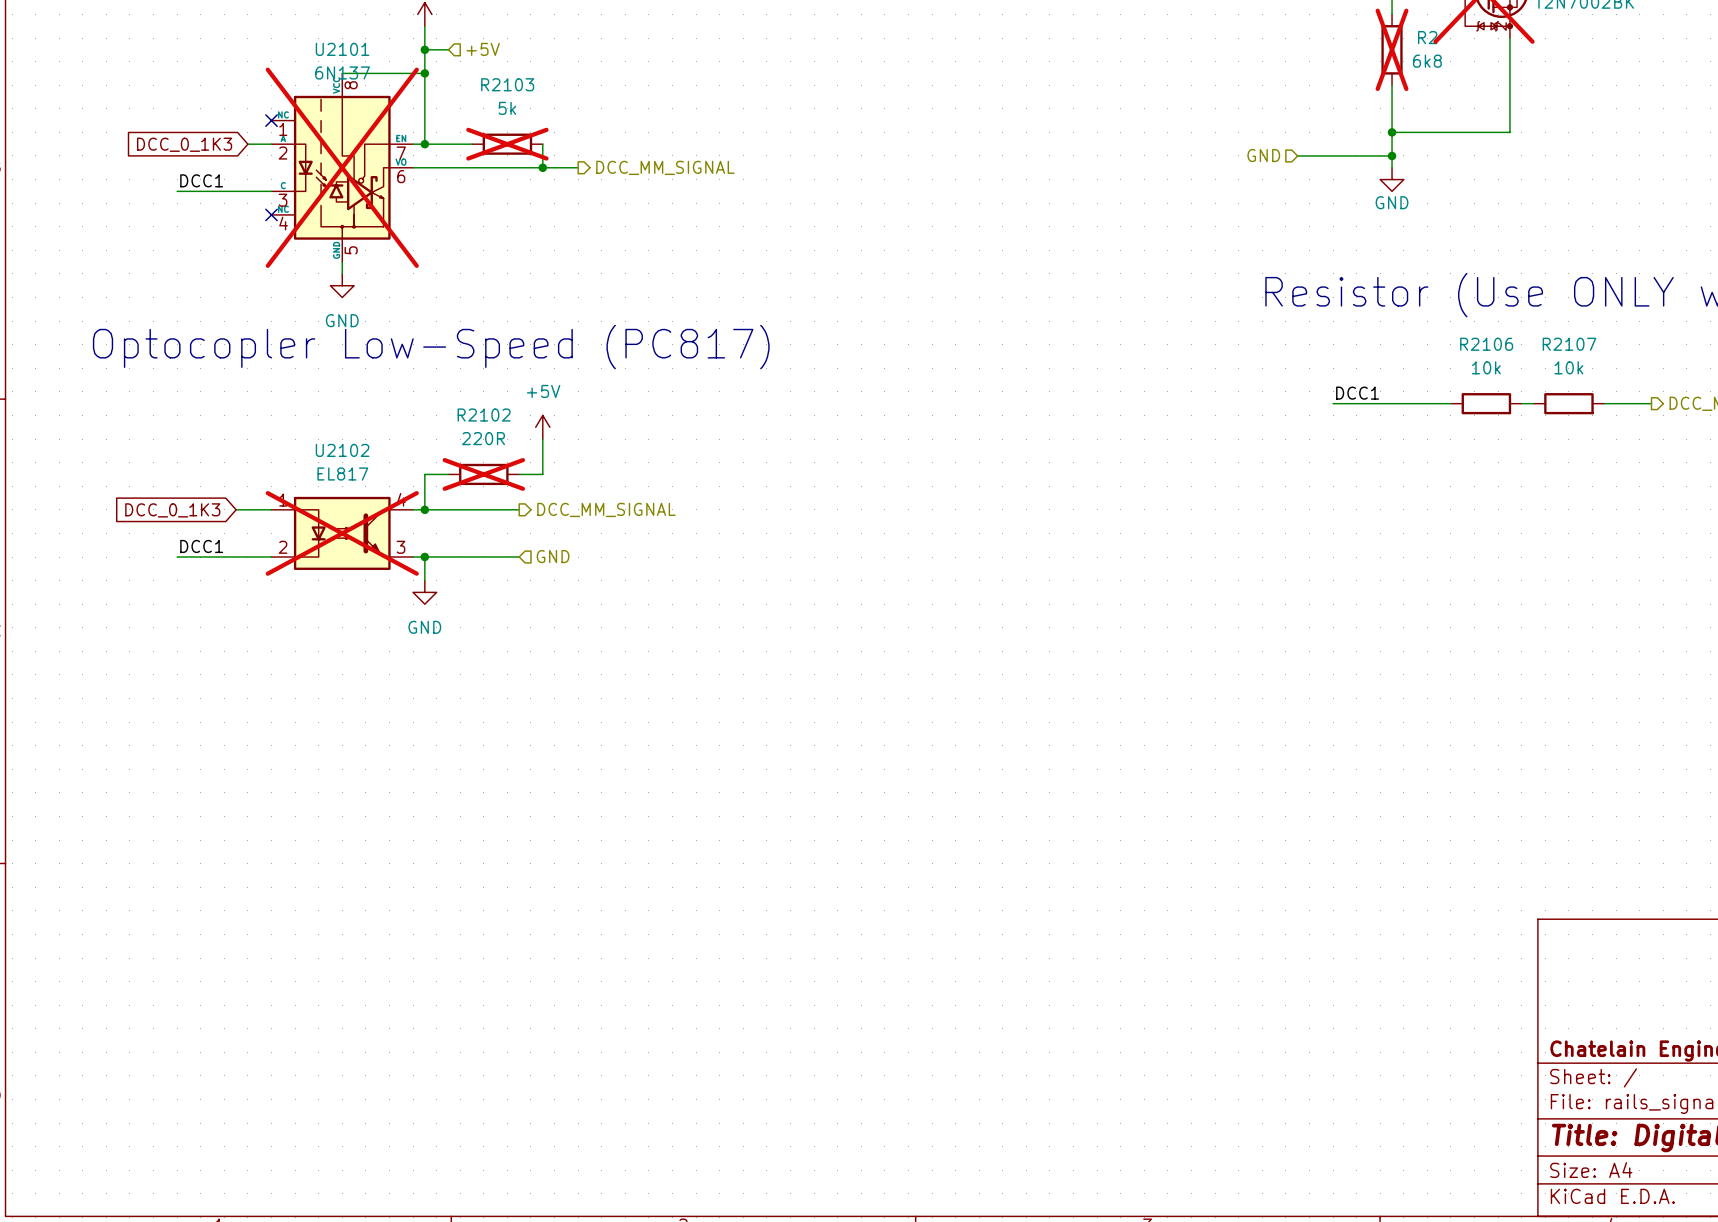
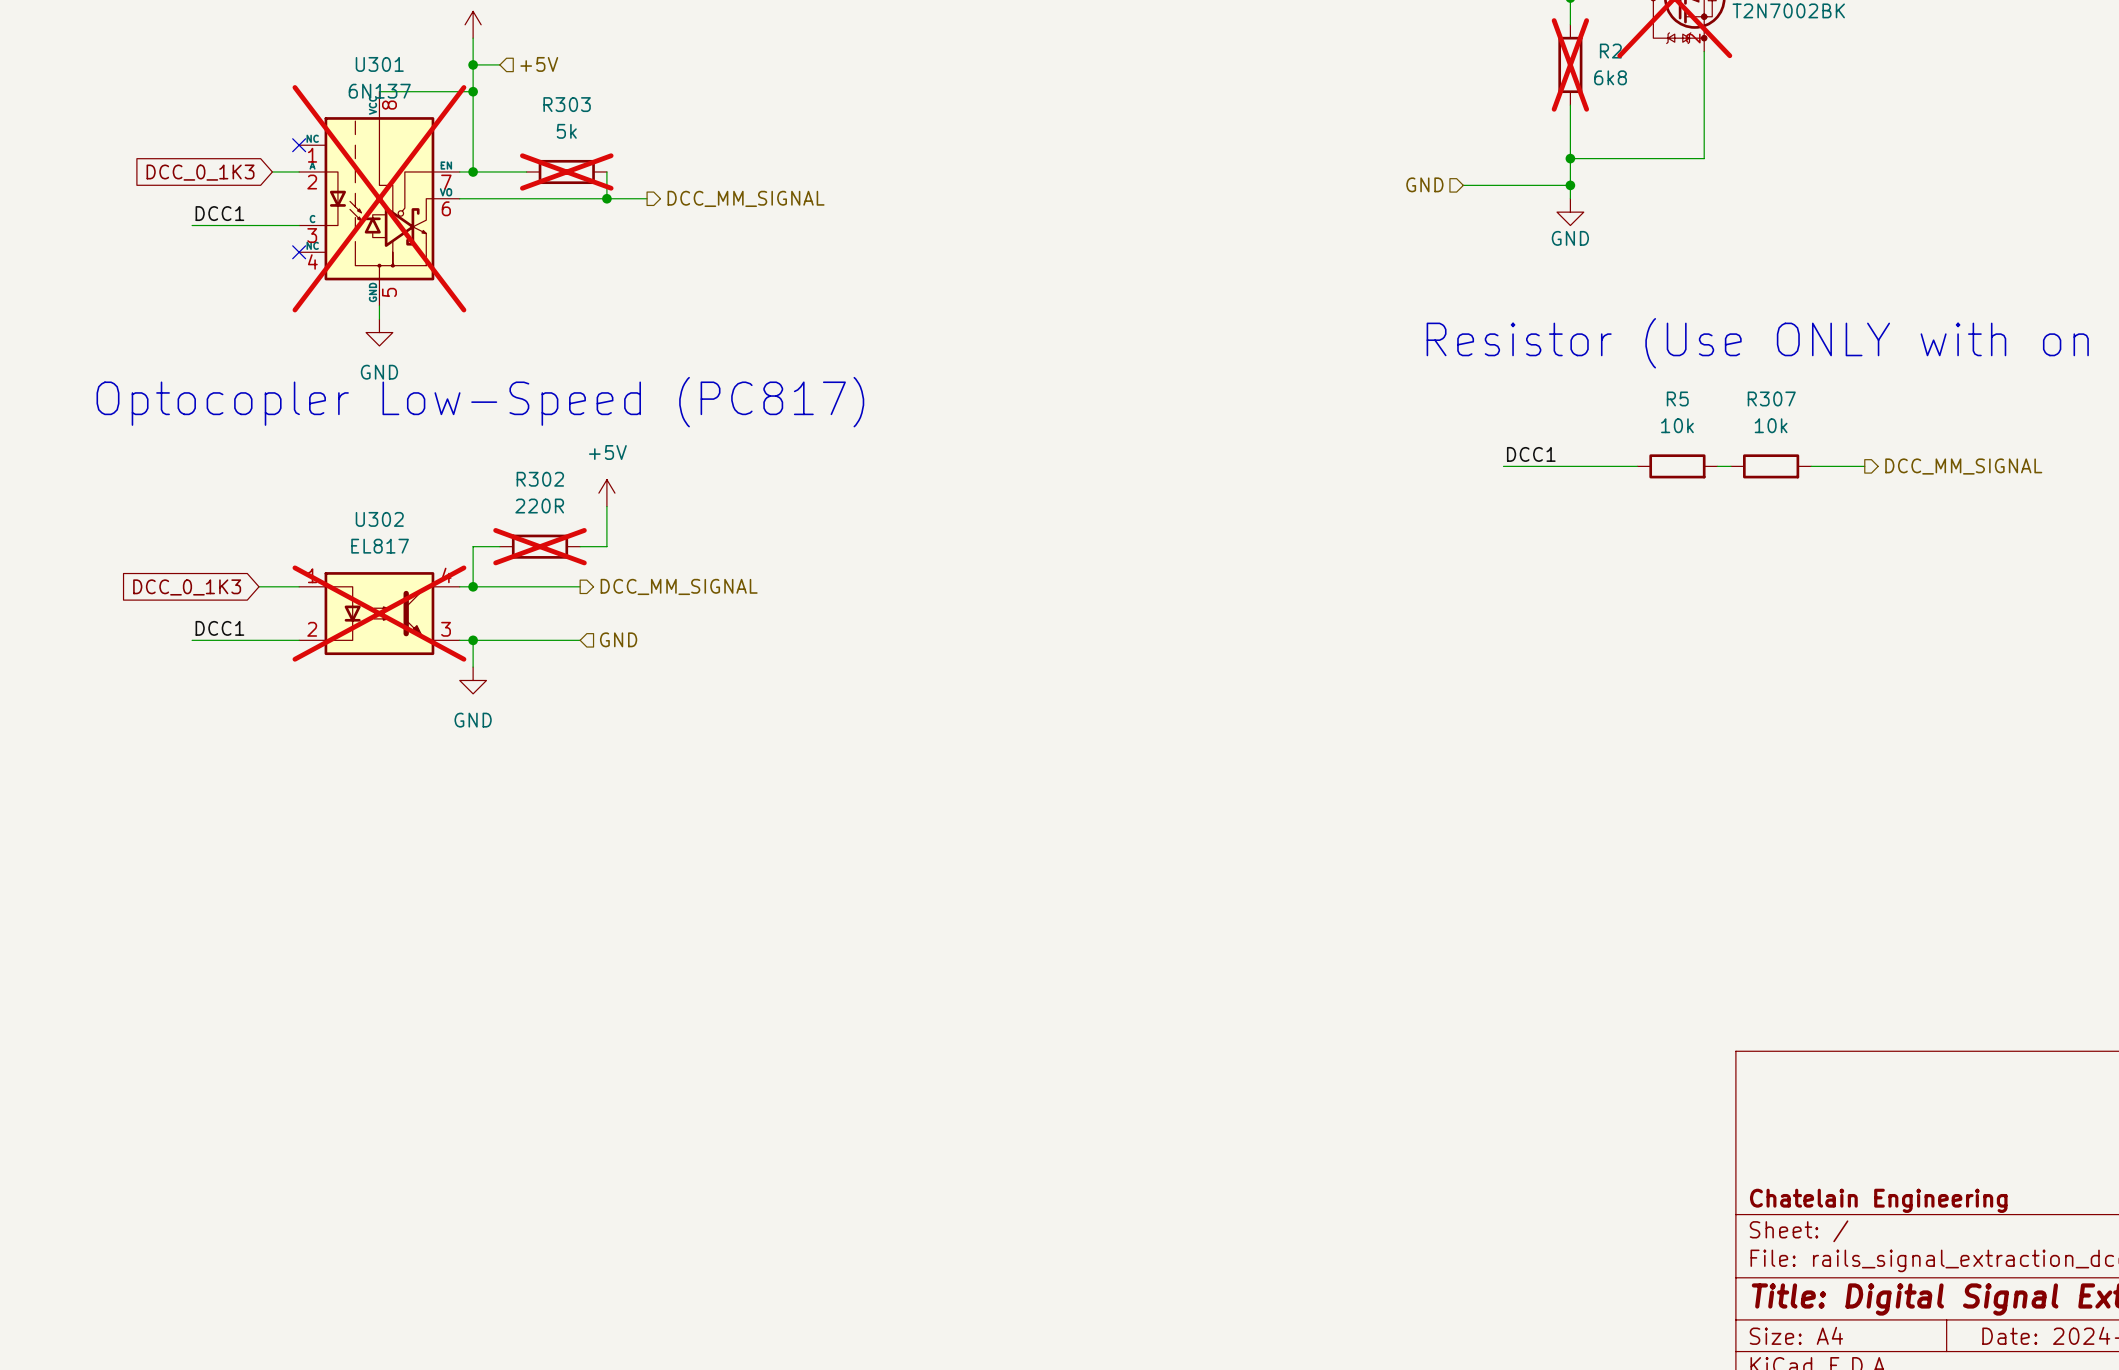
U2101 name: U2101 (342, 49) -> U301 (379, 64)
R2103 name: R2103 (507, 84) -> R303 (567, 104)
R2106 name: R2106 (1486, 344) -> R5 (1677, 398)
R2107 name: R2107 (1569, 344) -> R307 (1771, 398)
R2102 name: R2102 (484, 415) -> R302 (540, 479)
U2102 name: U2102 (342, 450) -> U302 (379, 519)

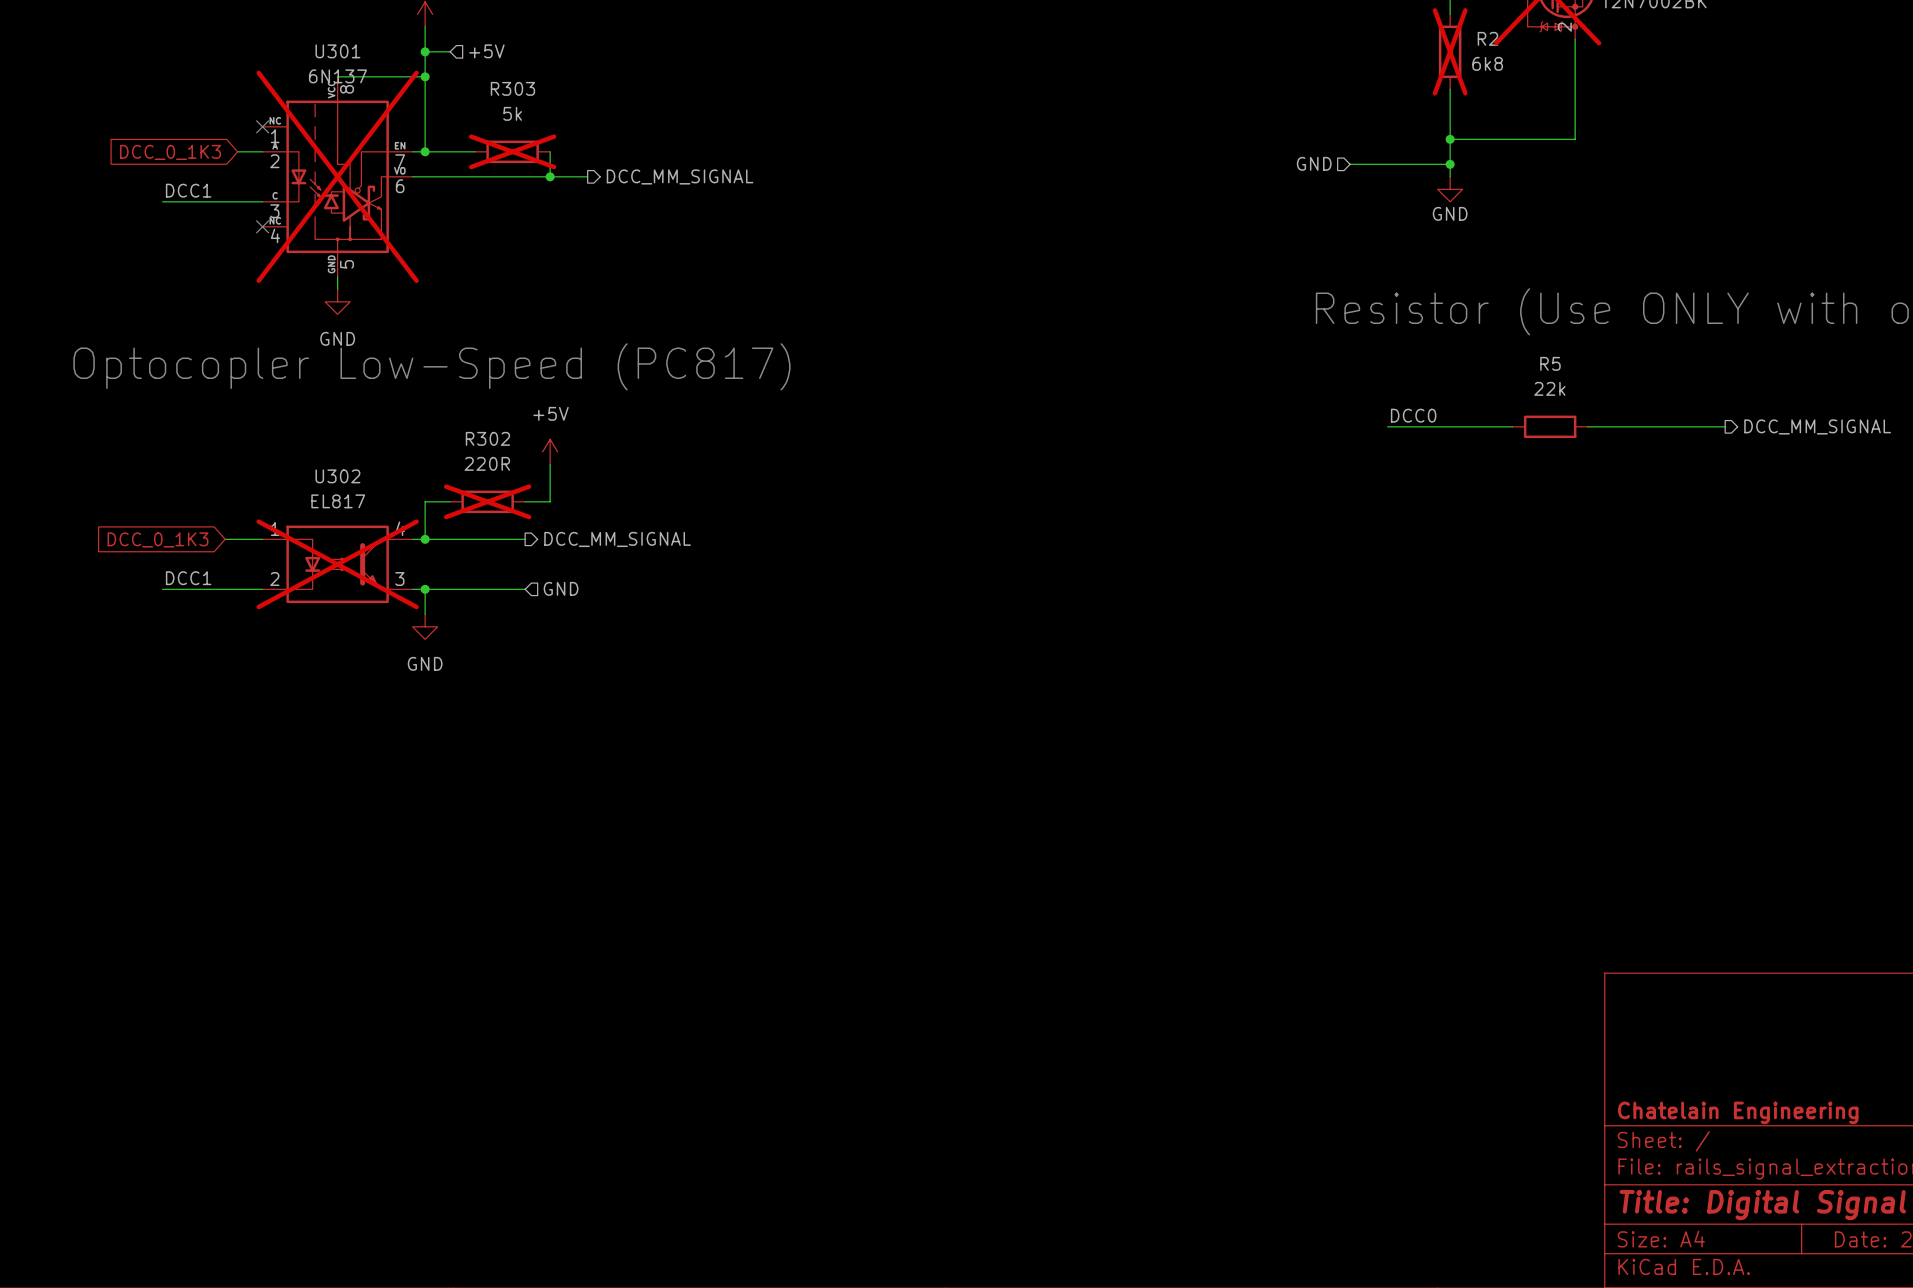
R5 value: 10k (1677, 425) -> 22k (1549, 388)
label: DCC1 (1531, 454) -> DCC0 (1413, 415)
wire: none -> (1600, 426) (1675, 426)
R307: 10k (1771, 466) -> none

